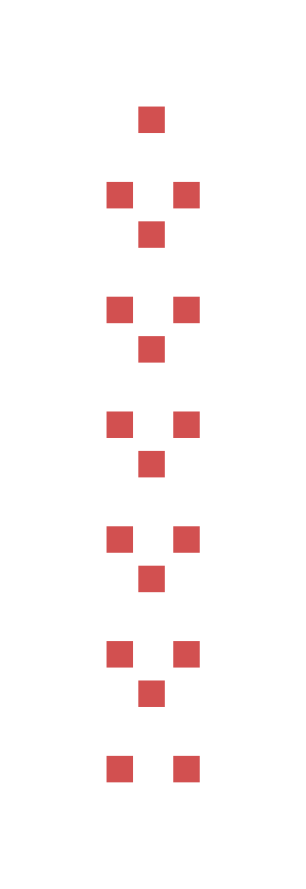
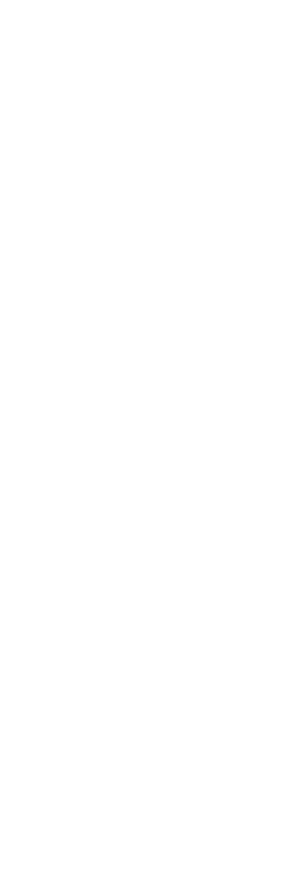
part: (153, 157) -> none
part: (153, 272) -> none
part: (153, 387) -> none
part: (153, 501) -> none
part: (153, 616) -> none
part: (153, 731) -> none

